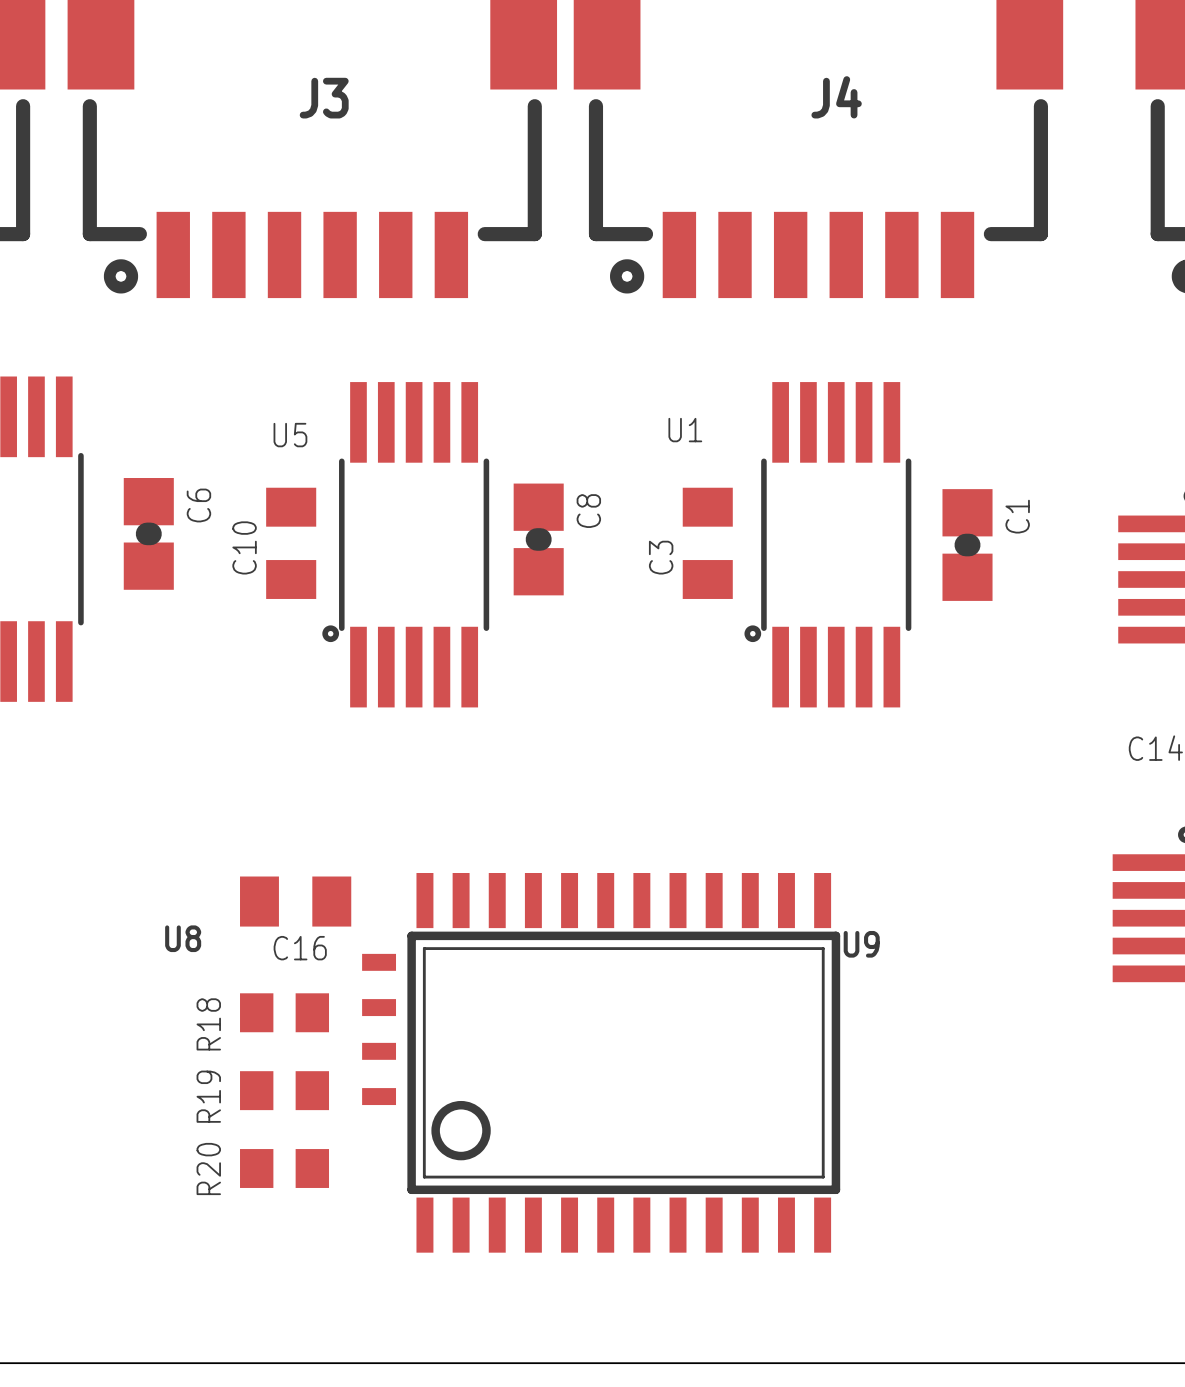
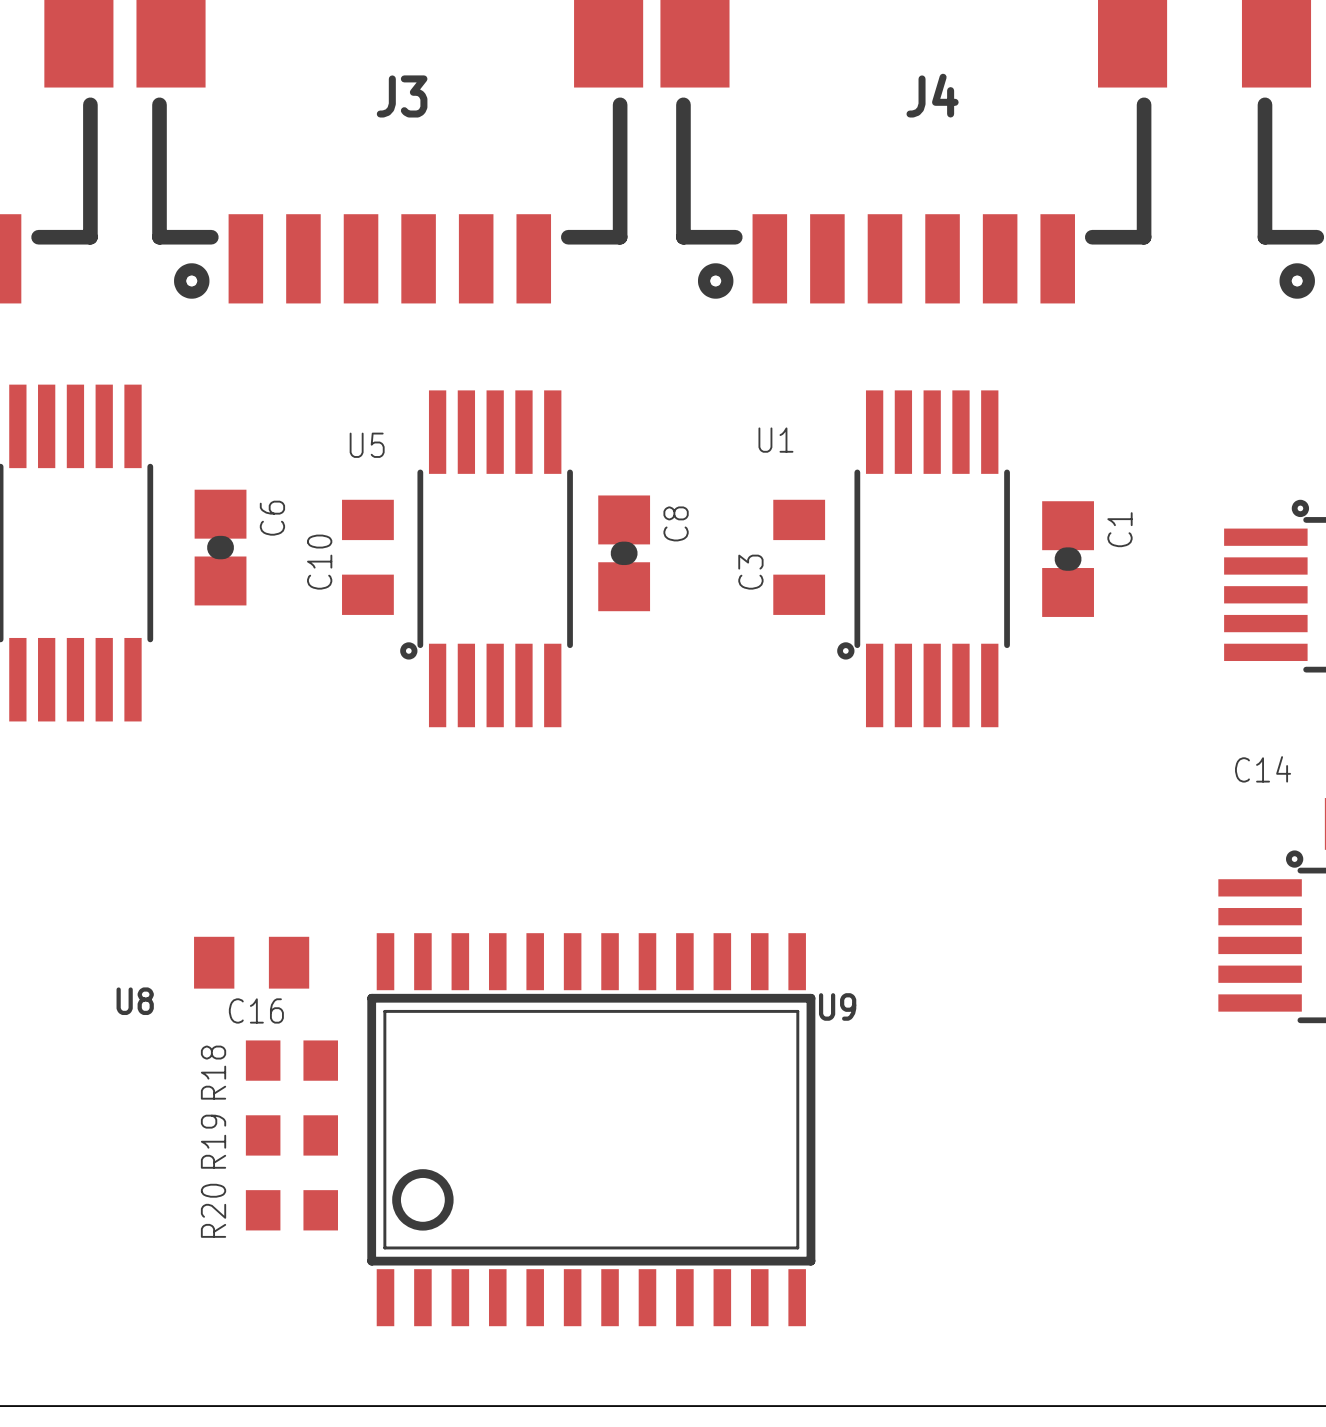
C16 position: (295, 901) -> (251, 962)
U8 name position: U8 (183, 938) -> U8 (135, 1001)
part: (379, 984) -> none
R18 position: (284, 1012) -> (291, 1060)
U9 position: (623, 1062) -> (591, 1129)
part: (379, 1073) -> none
R19 position: (284, 1090) -> (291, 1135)
R20 position: (284, 1168) -> (291, 1210)

